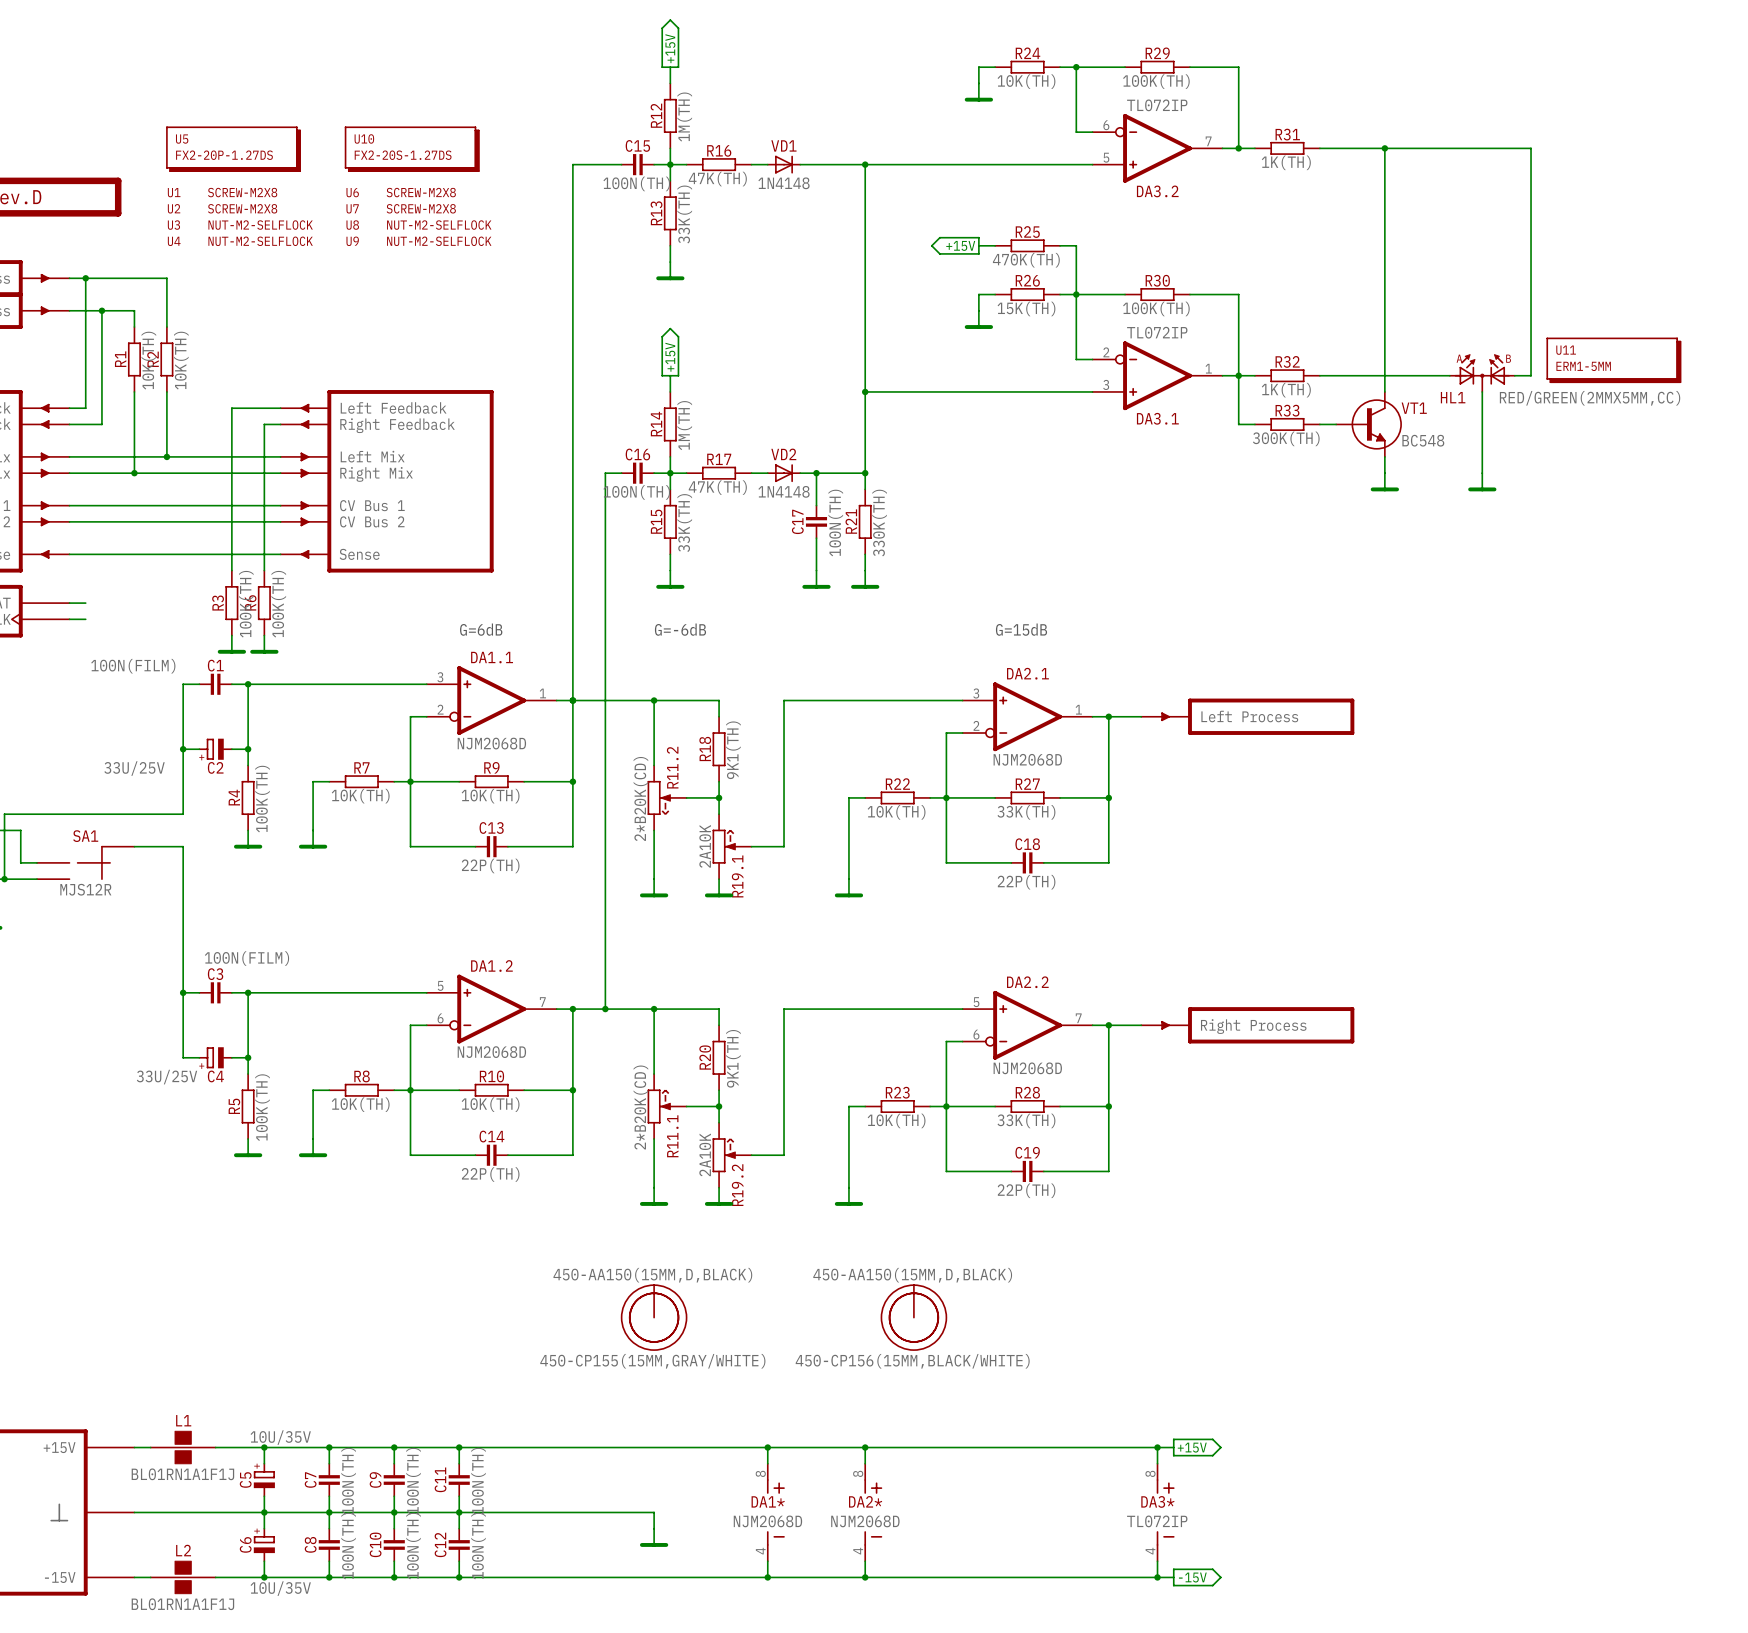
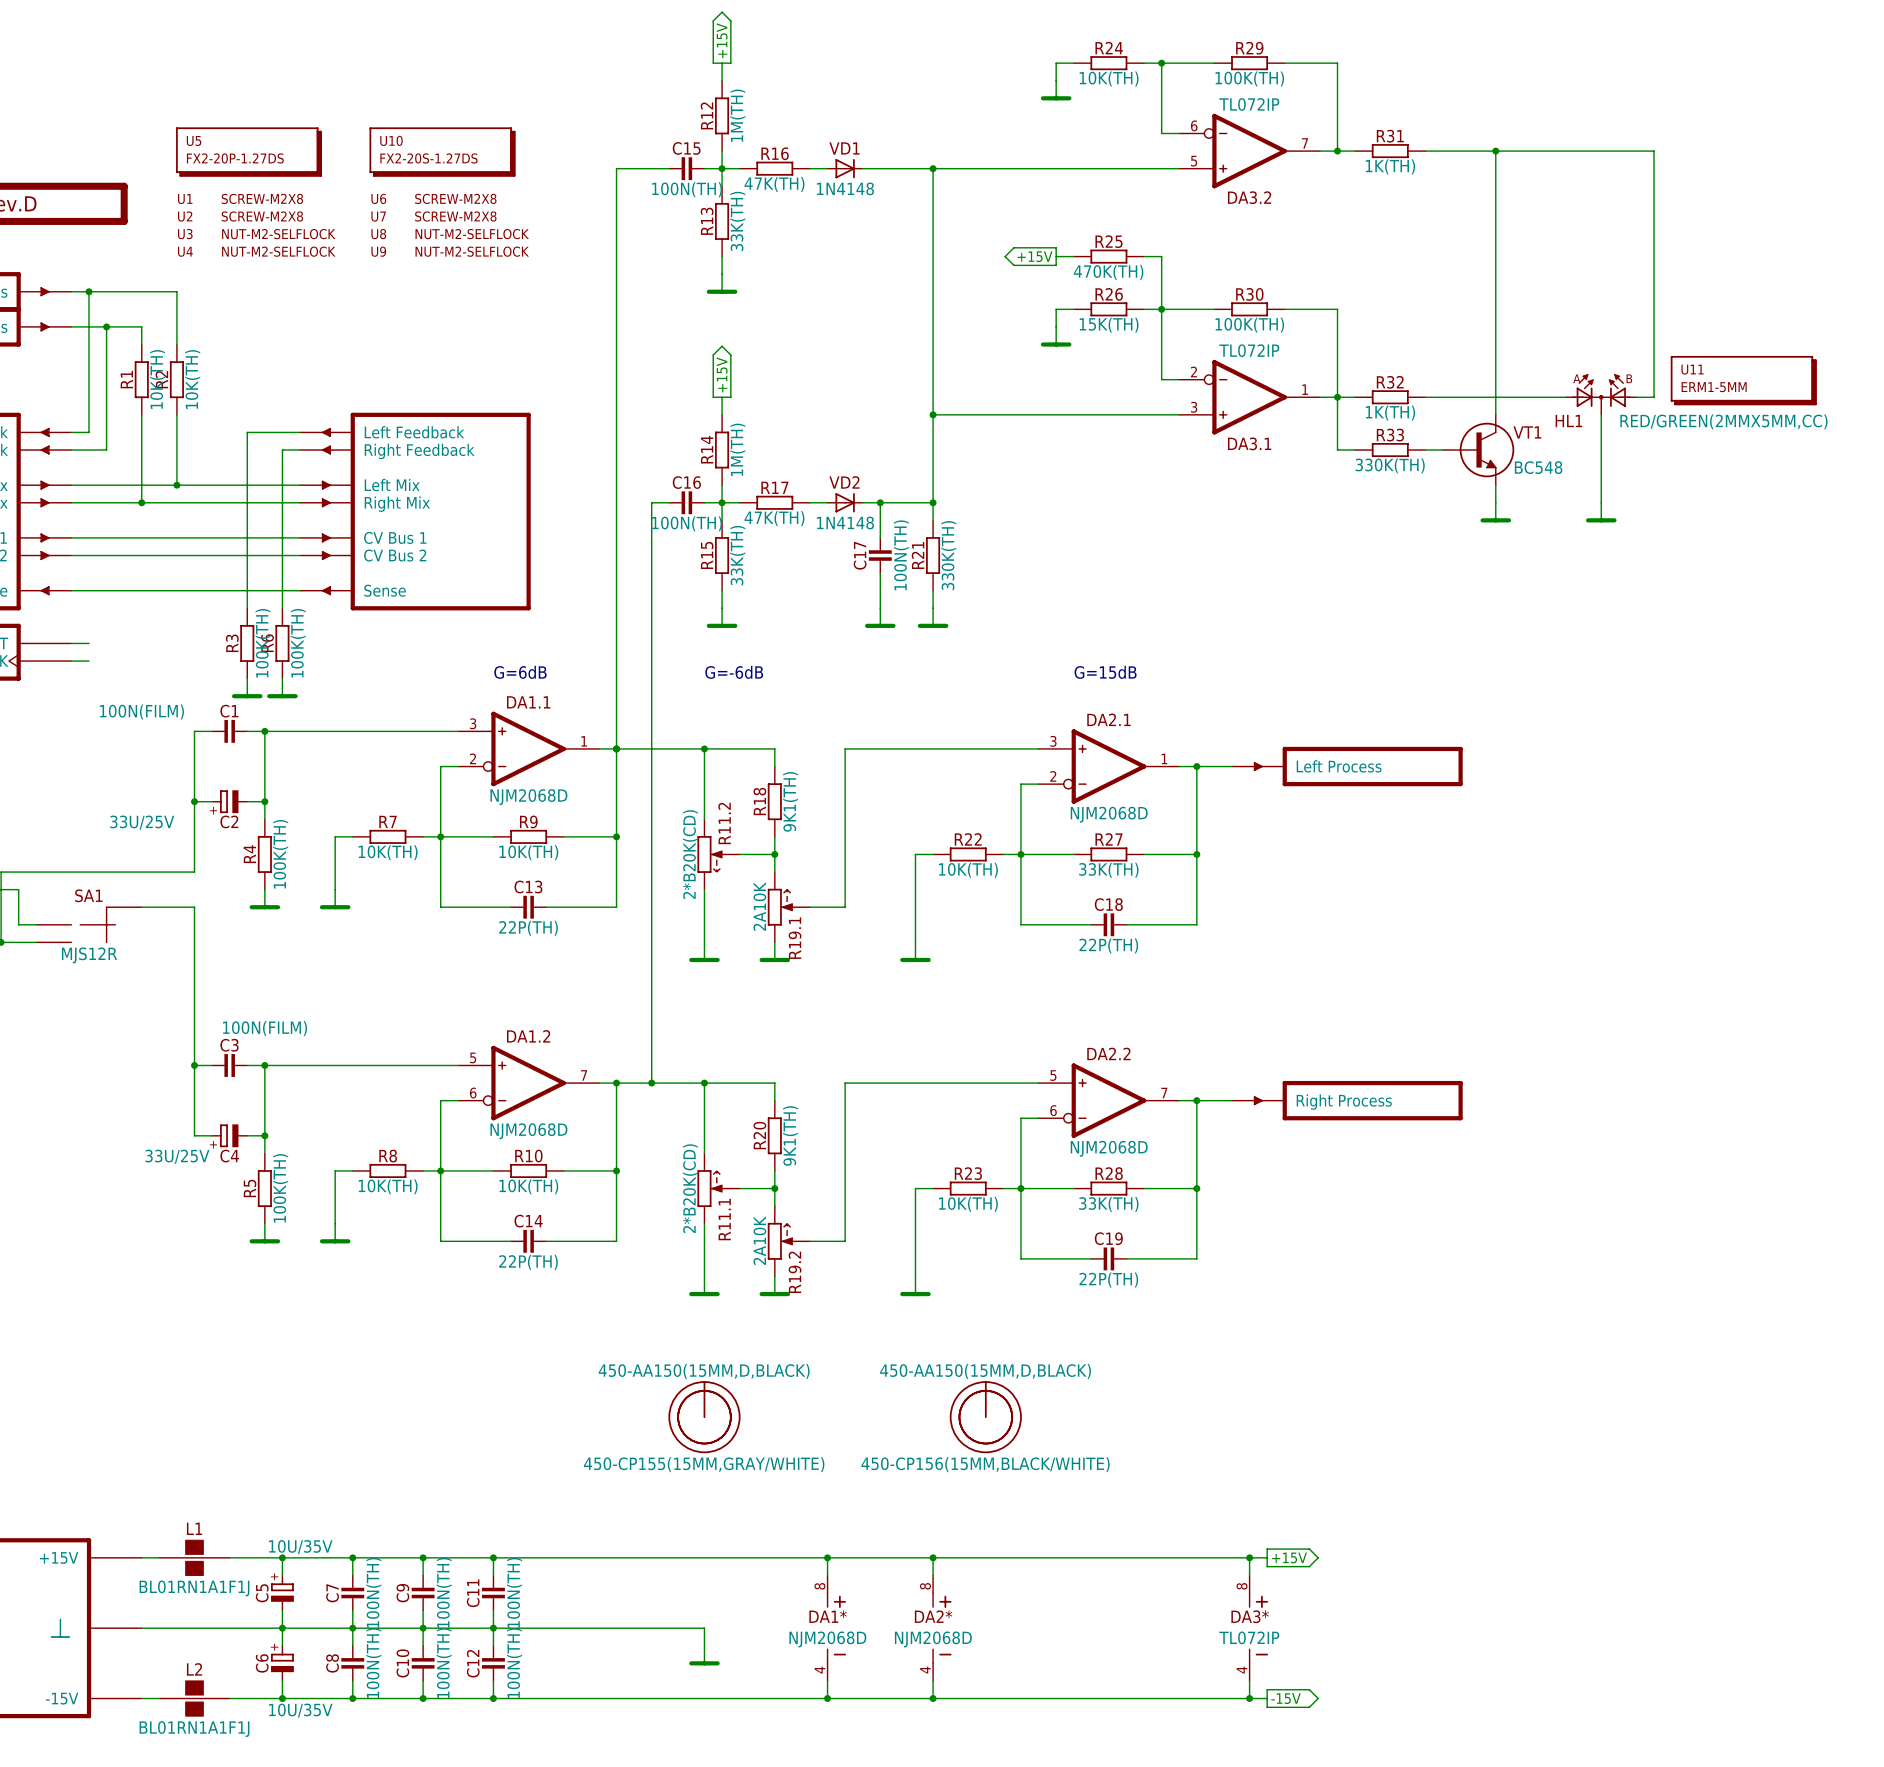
R33 value: 300K(TH) (1286, 438) -> 330K(TH) (1390, 465)

